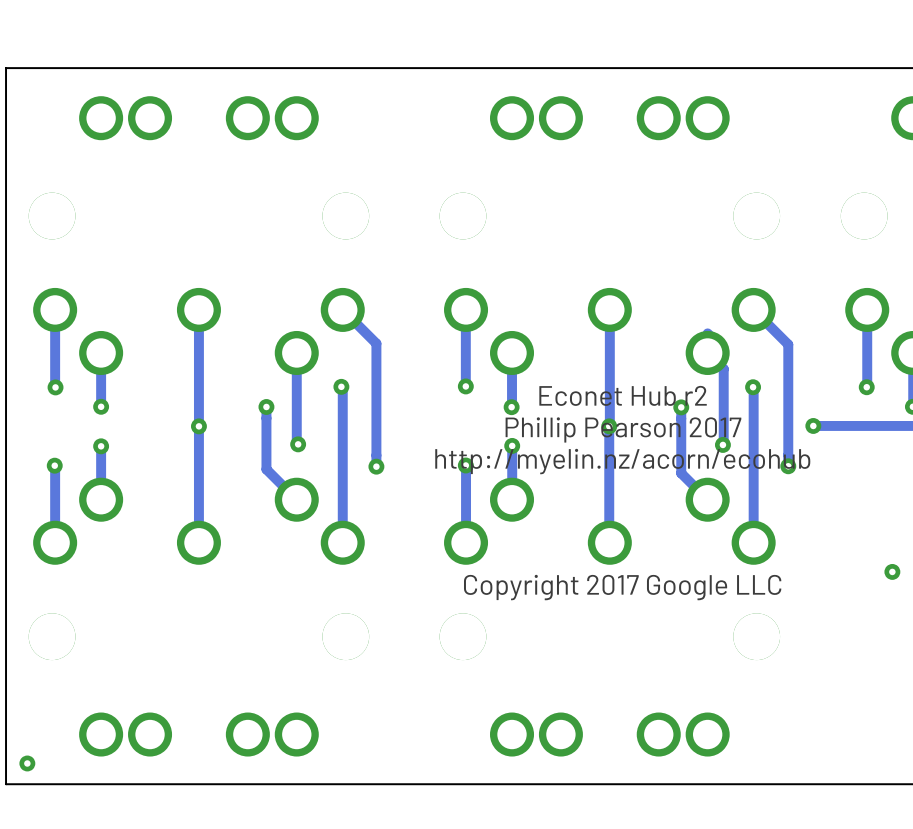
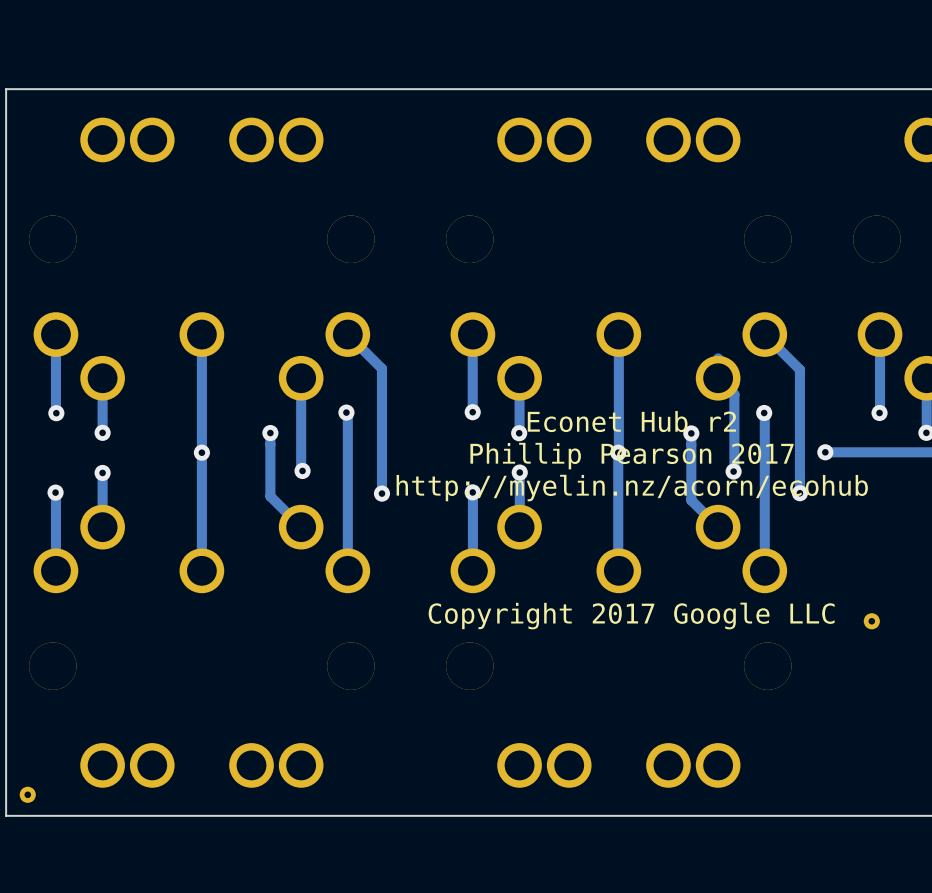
part position: (892, 571) -> (871, 621)

